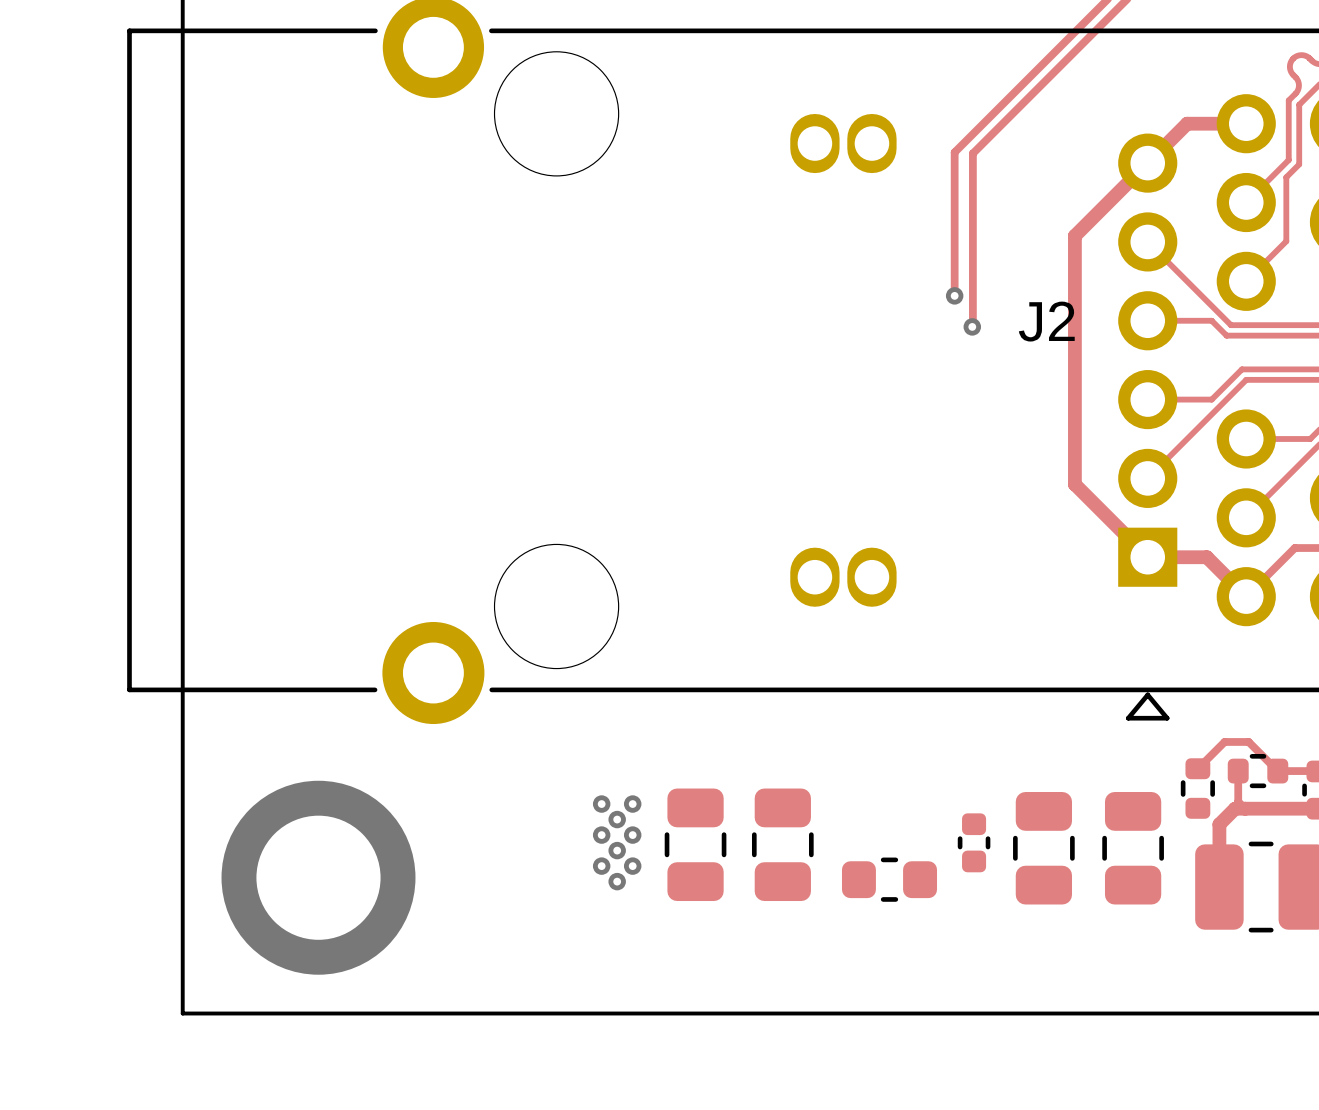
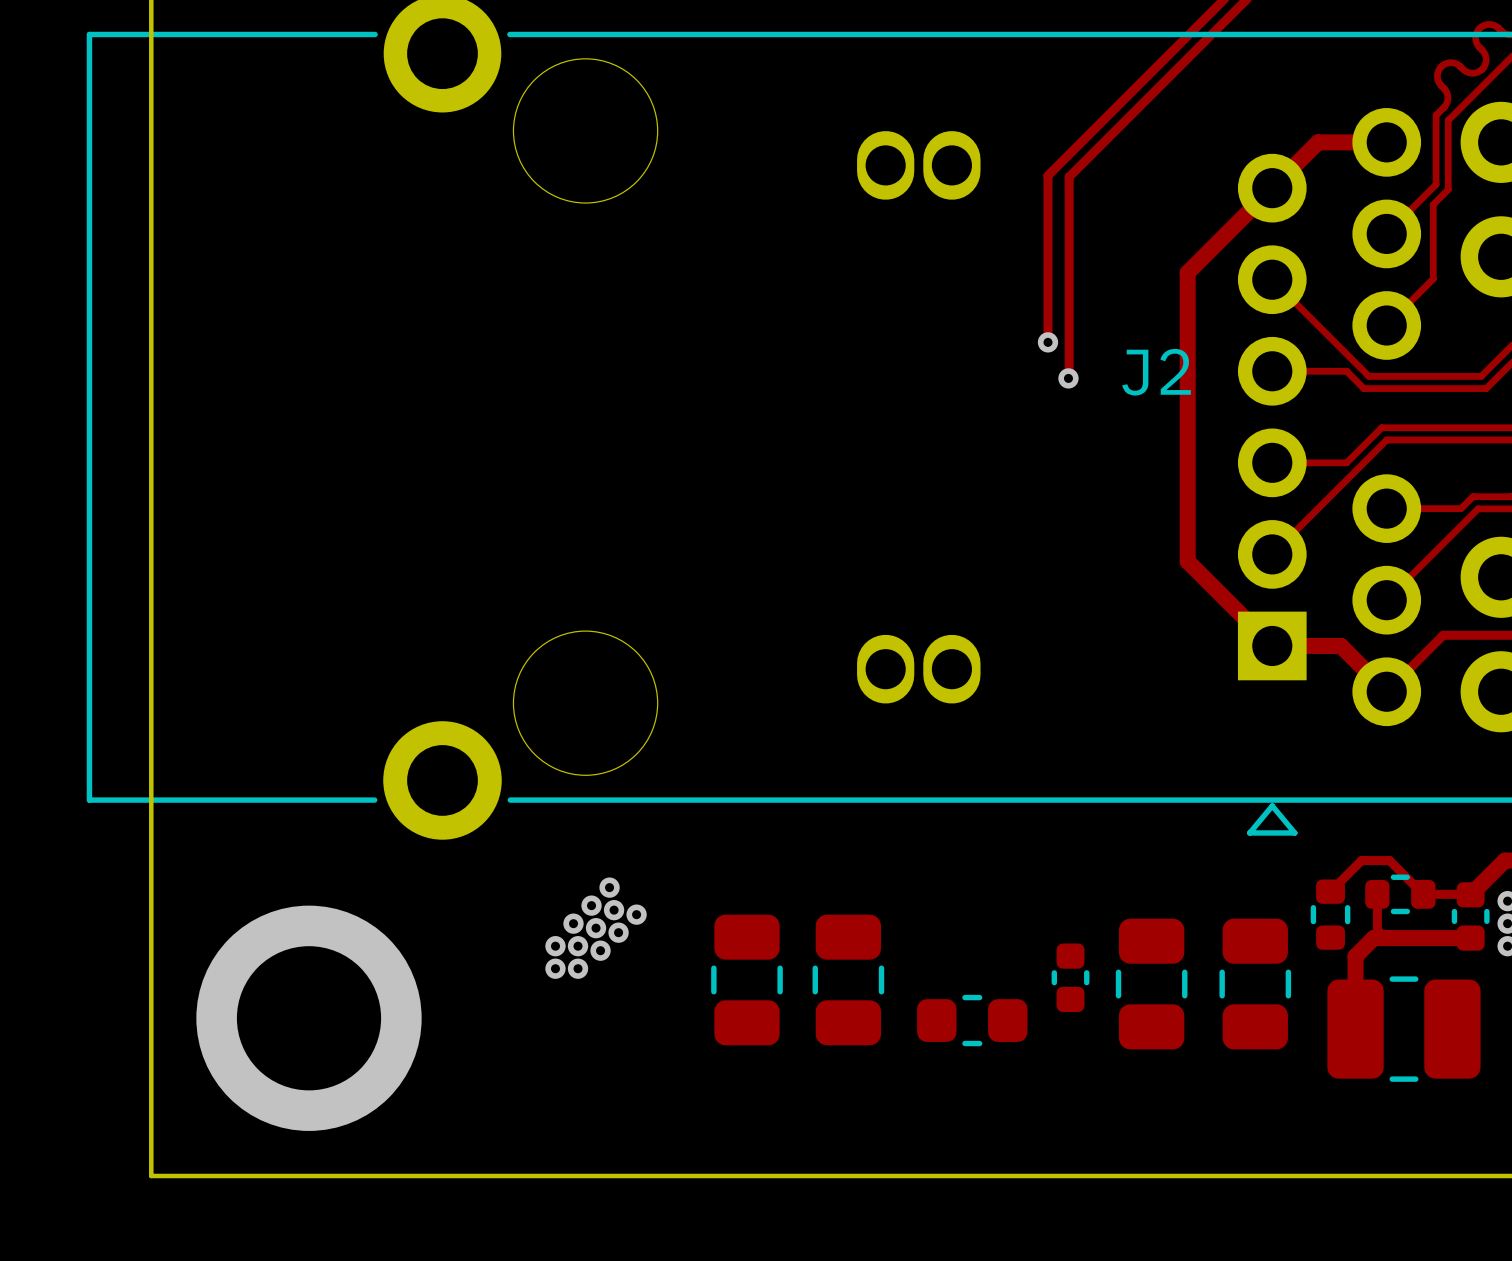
via: none -> (609, 887)
via: none -> (591, 905)
via: none -> (614, 910)
via: none -> (636, 914)
via: none -> (573, 923)
via: none -> (596, 928)
via: none -> (618, 932)
via: (601, 804) -> none
via: (632, 804) -> none
via: none -> (555, 946)
via: none -> (578, 946)
via: none -> (600, 950)
via: (617, 819) -> none
via: none -> (555, 968)
via: none -> (578, 968)
via: (601, 835) -> none
via: (632, 835) -> none
via: (617, 850) -> none
via: (601, 866) -> none
via: (632, 866) -> none
via: (617, 881) -> none

